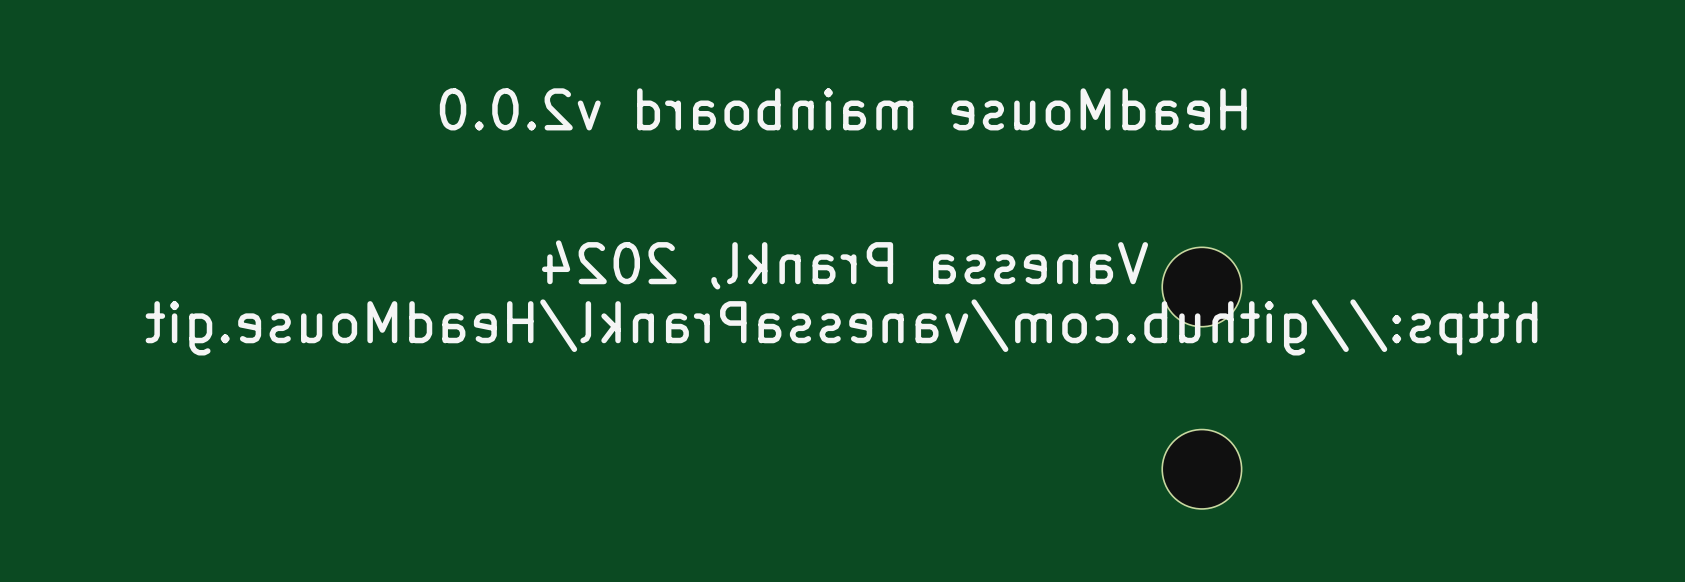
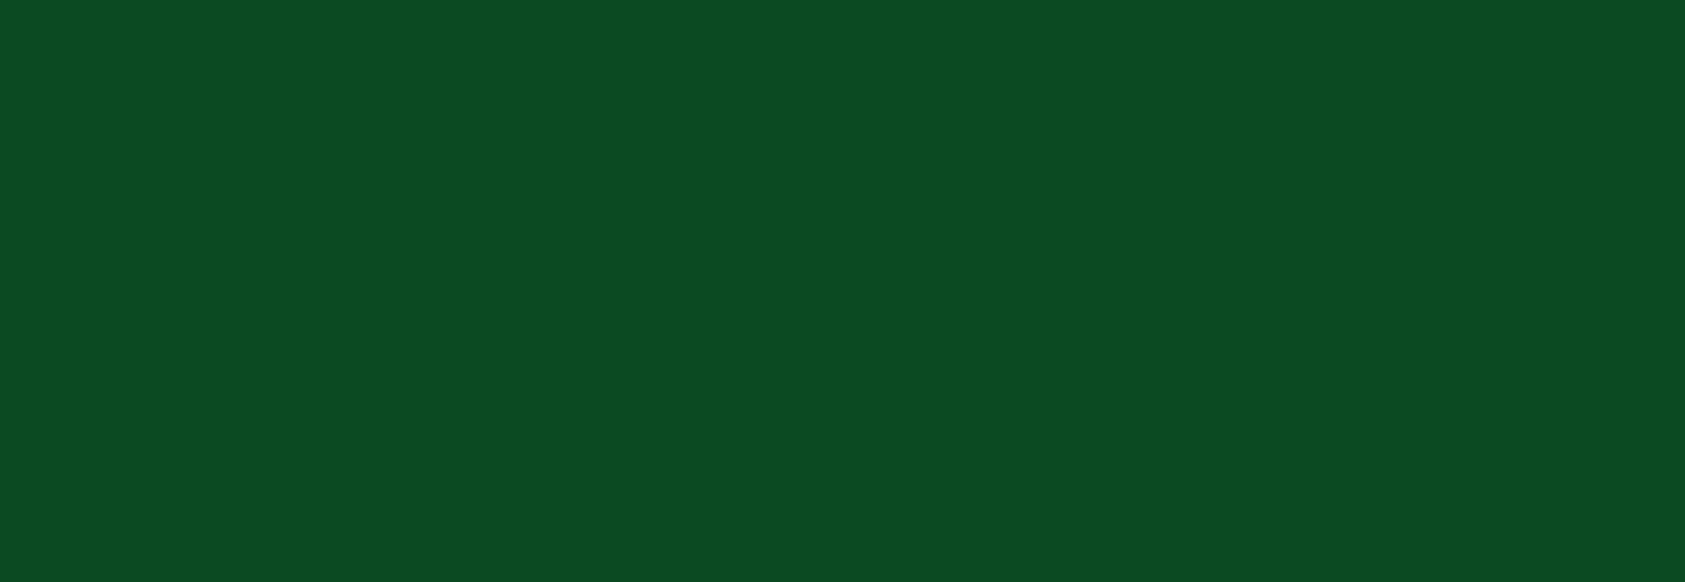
drawing: [145, 88, 1538, 356] -> none
part: (1201, 287) -> none
part: (1201, 469) -> none

